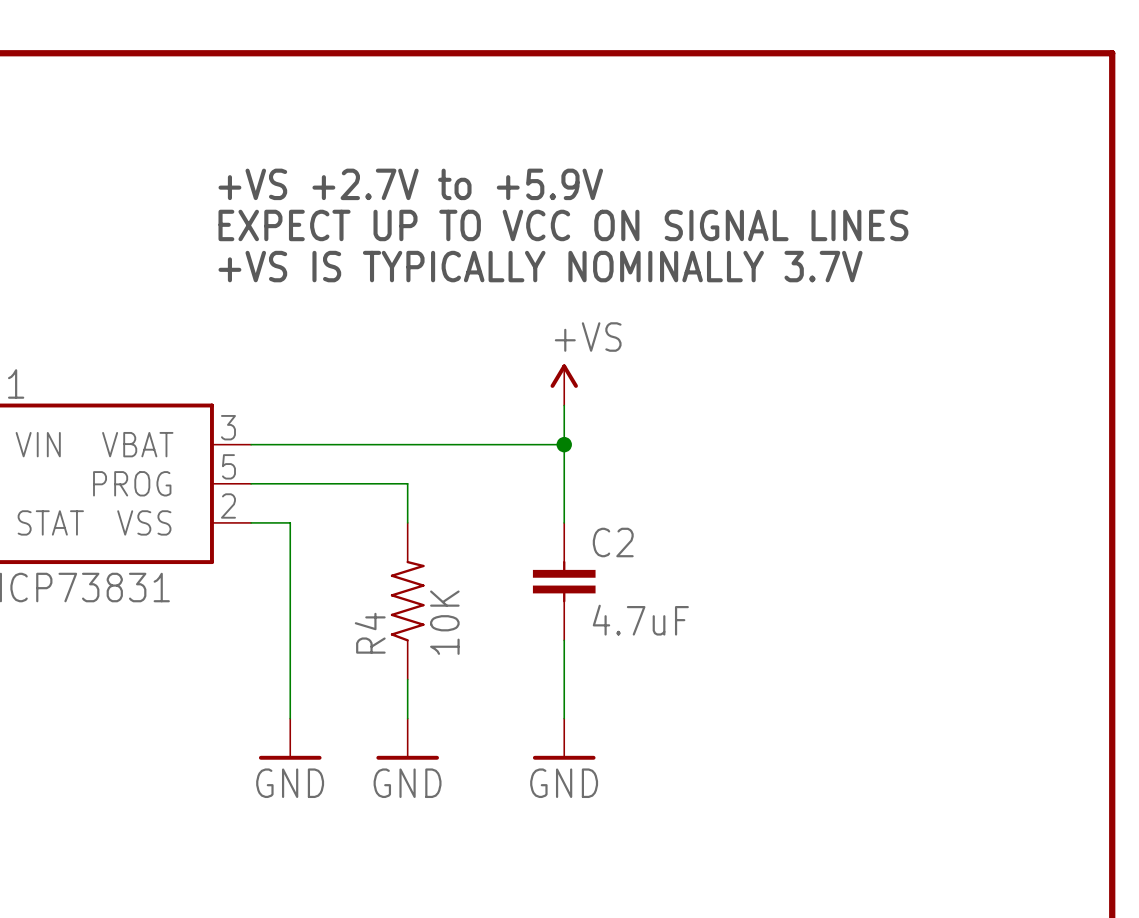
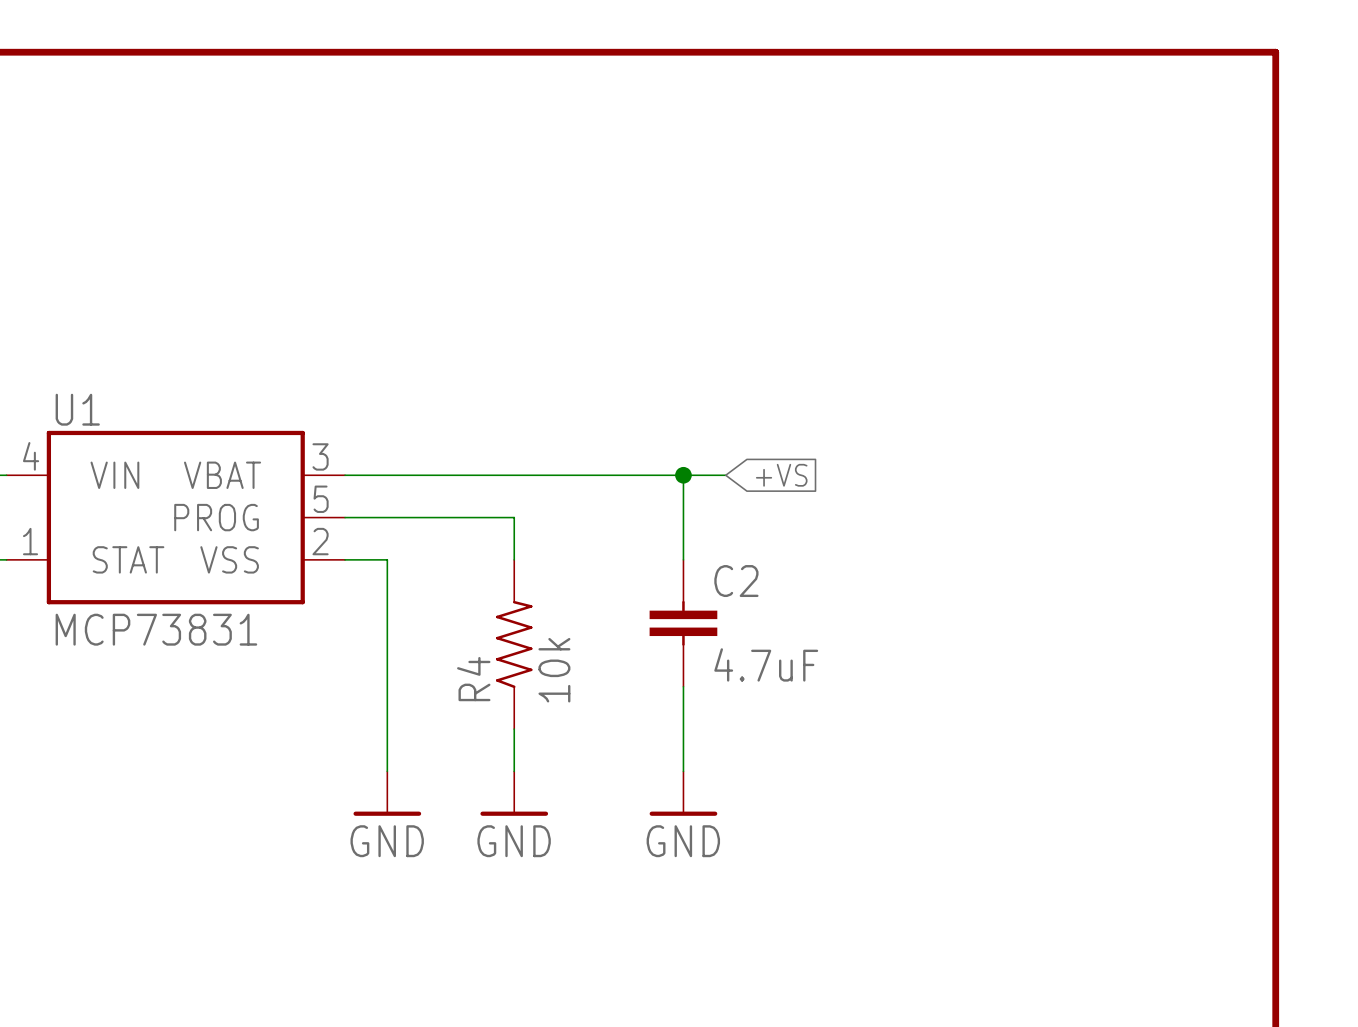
text: +VS +2.7V to +5.9V (410, 184) -> none
text: EXPECT UP TO VCC ON SIGNAL LINES (563, 225) -> none
text: +VS IS TYPICALLY NOMINALLY 3.7V (540, 266) -> none
power symbol: +VS (564, 384) -> none
wire: (564, 405) (564, 444) -> (725, 475) (683, 475)
global label: none -> +VS (781, 475)
R4 value: 10K (444, 622) -> 10k (554, 670)

